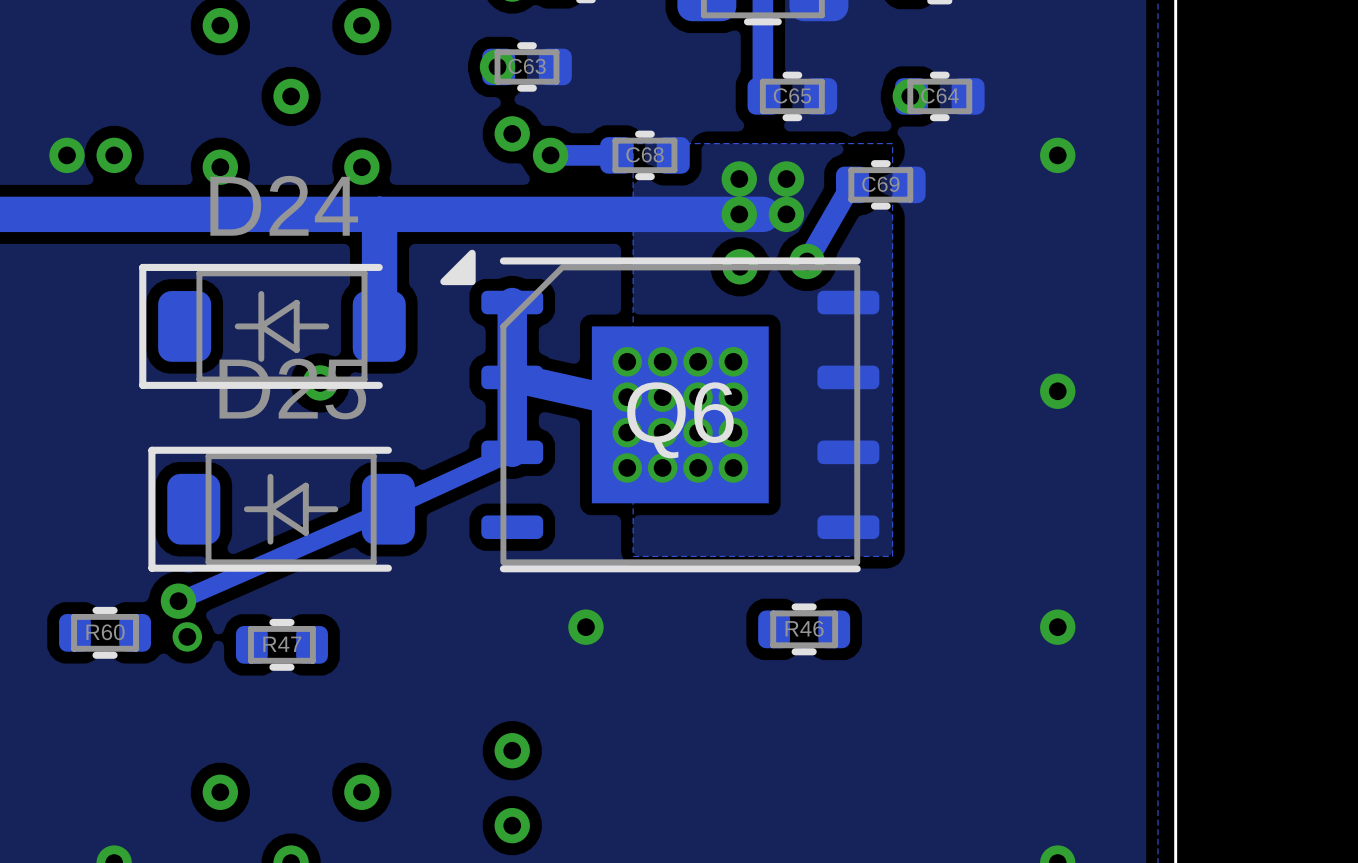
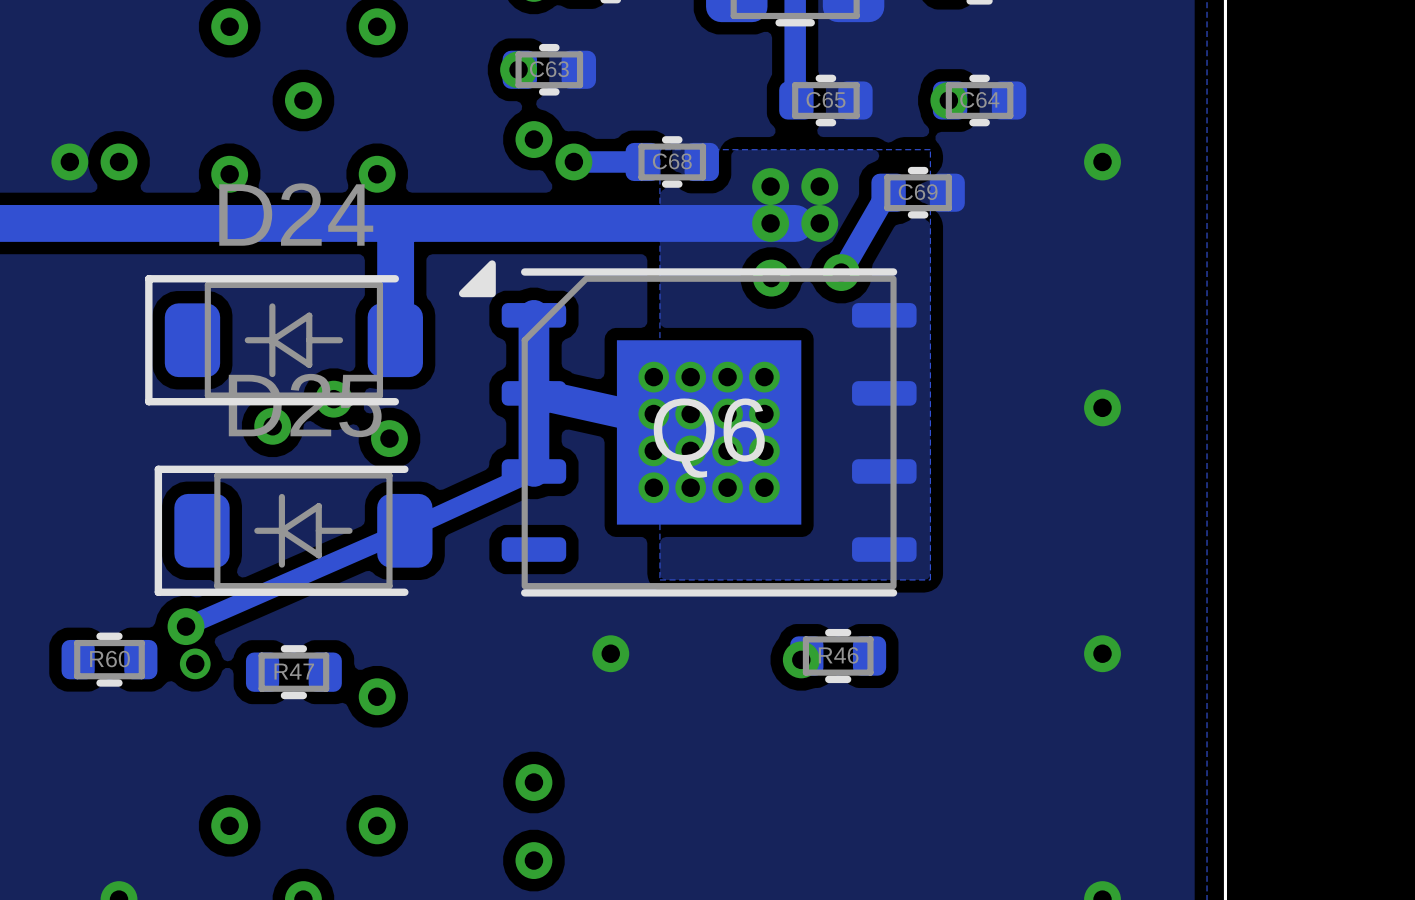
via: none -> (272, 426)
via: none -> (389, 438)
via: none -> (801, 659)
via: none -> (377, 696)

